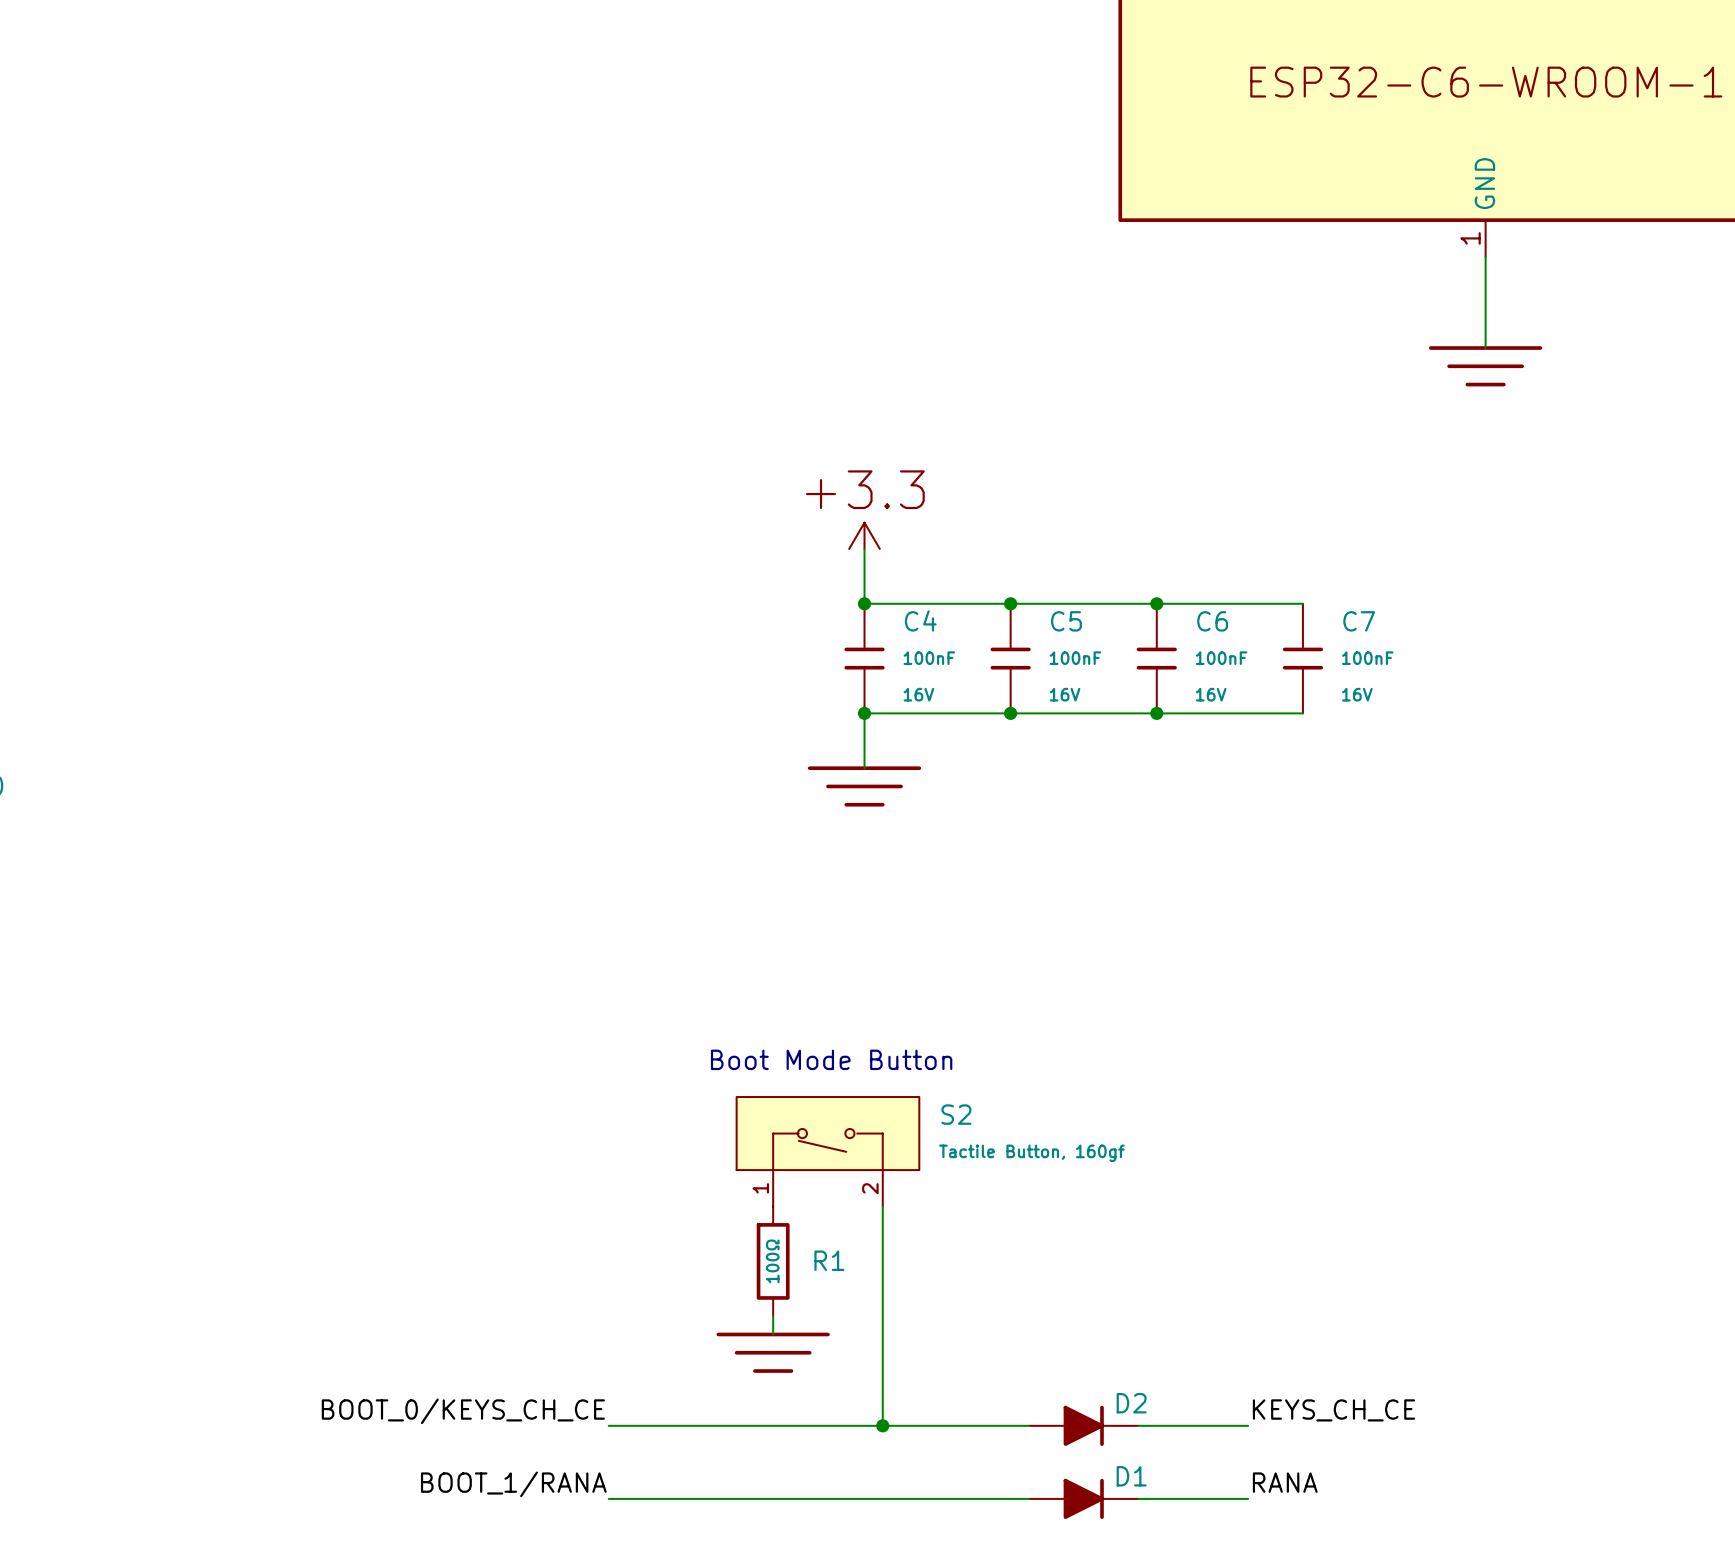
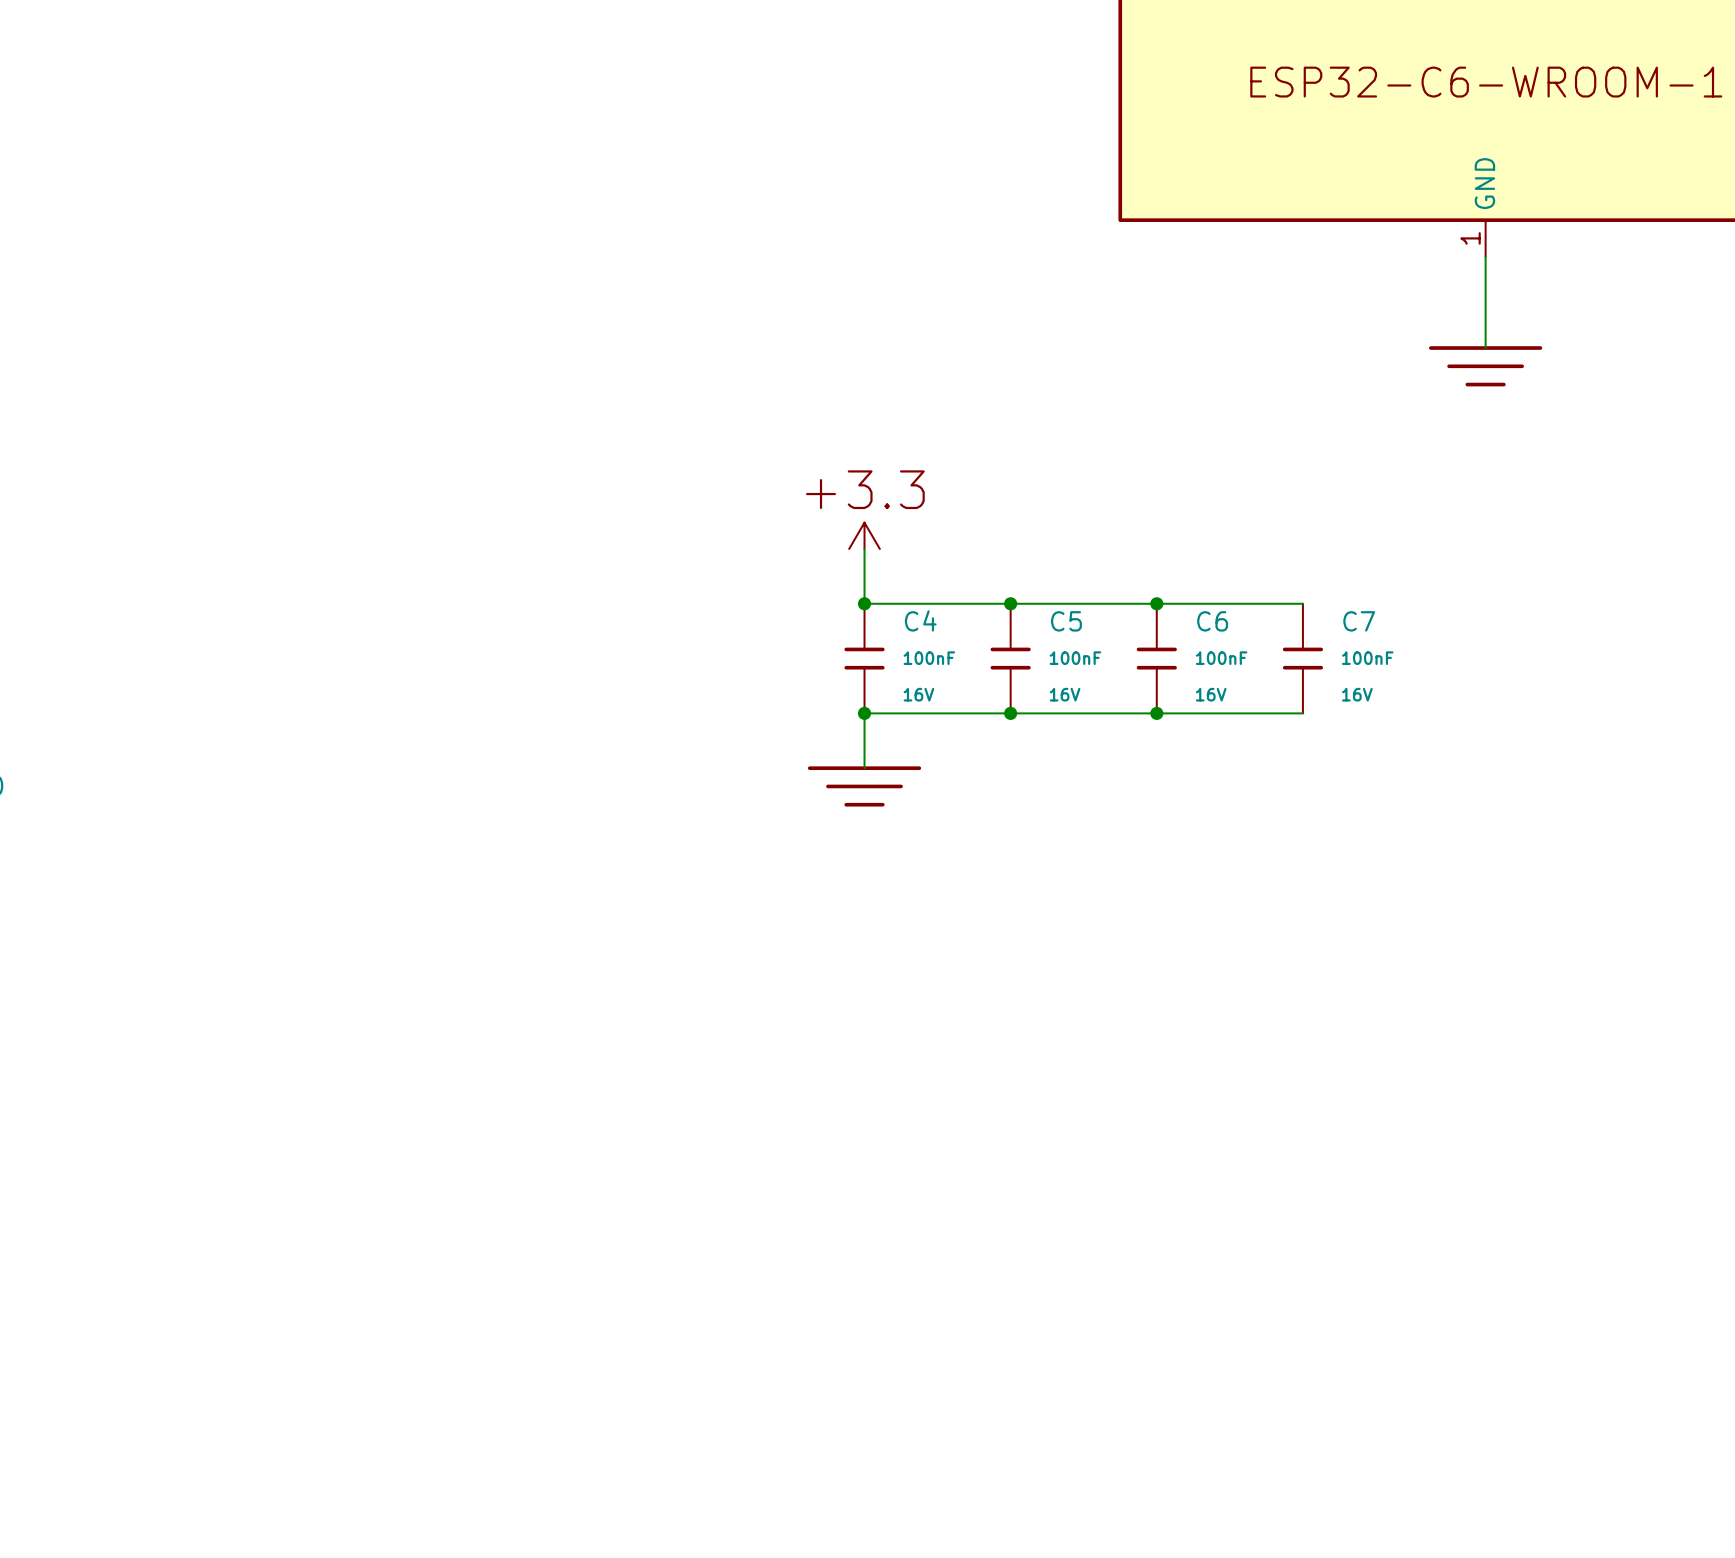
text: Boot Mode Button (831, 1059) -> none
S2: Tactile Button, 160gf (827, 1151) -> none
wire: (882, 1206) (882, 1425) -> none
R1: 100Ω (773, 1261) -> none
wire: (773, 1316) (773, 1334) -> none
power symbol: (773, 1352) -> none
label: KEYS_CH_CE (1333, 1410) -> none
label: BOOT_0/KEYS_CH_CE (463, 1411) -> none
wire: (608, 1425) (1028, 1425) -> none
junction: (882, 1425) -> none
D2: (1083, 1425) -> none
wire: (1138, 1425) (1248, 1425) -> none
label: RANA (1285, 1482) -> none
label: BOOT_1/RANA (513, 1484) -> none
wire: (608, 1498) (1028, 1498) -> none
D1: (1083, 1498) -> none
wire: (1138, 1498) (1248, 1498) -> none

